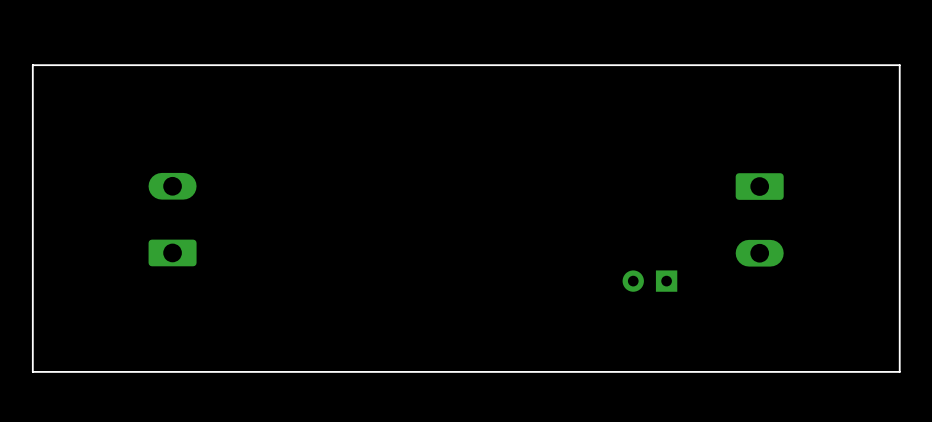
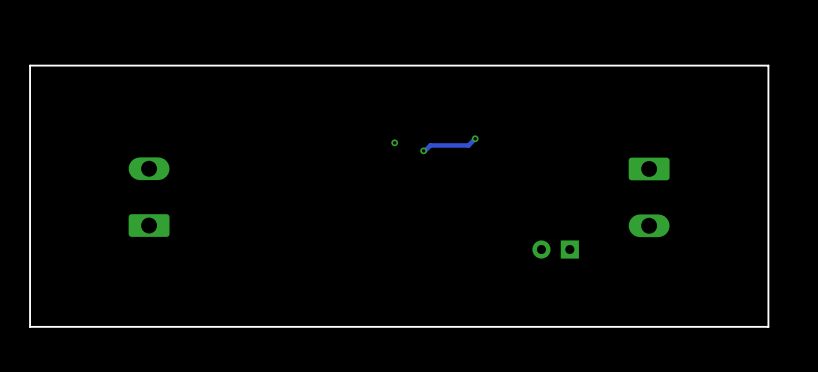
track: none -> (475, 138) (468, 145) (430, 145) (423, 150)
via: none -> (475, 138)
via: none -> (394, 142)
via: none -> (423, 150)

